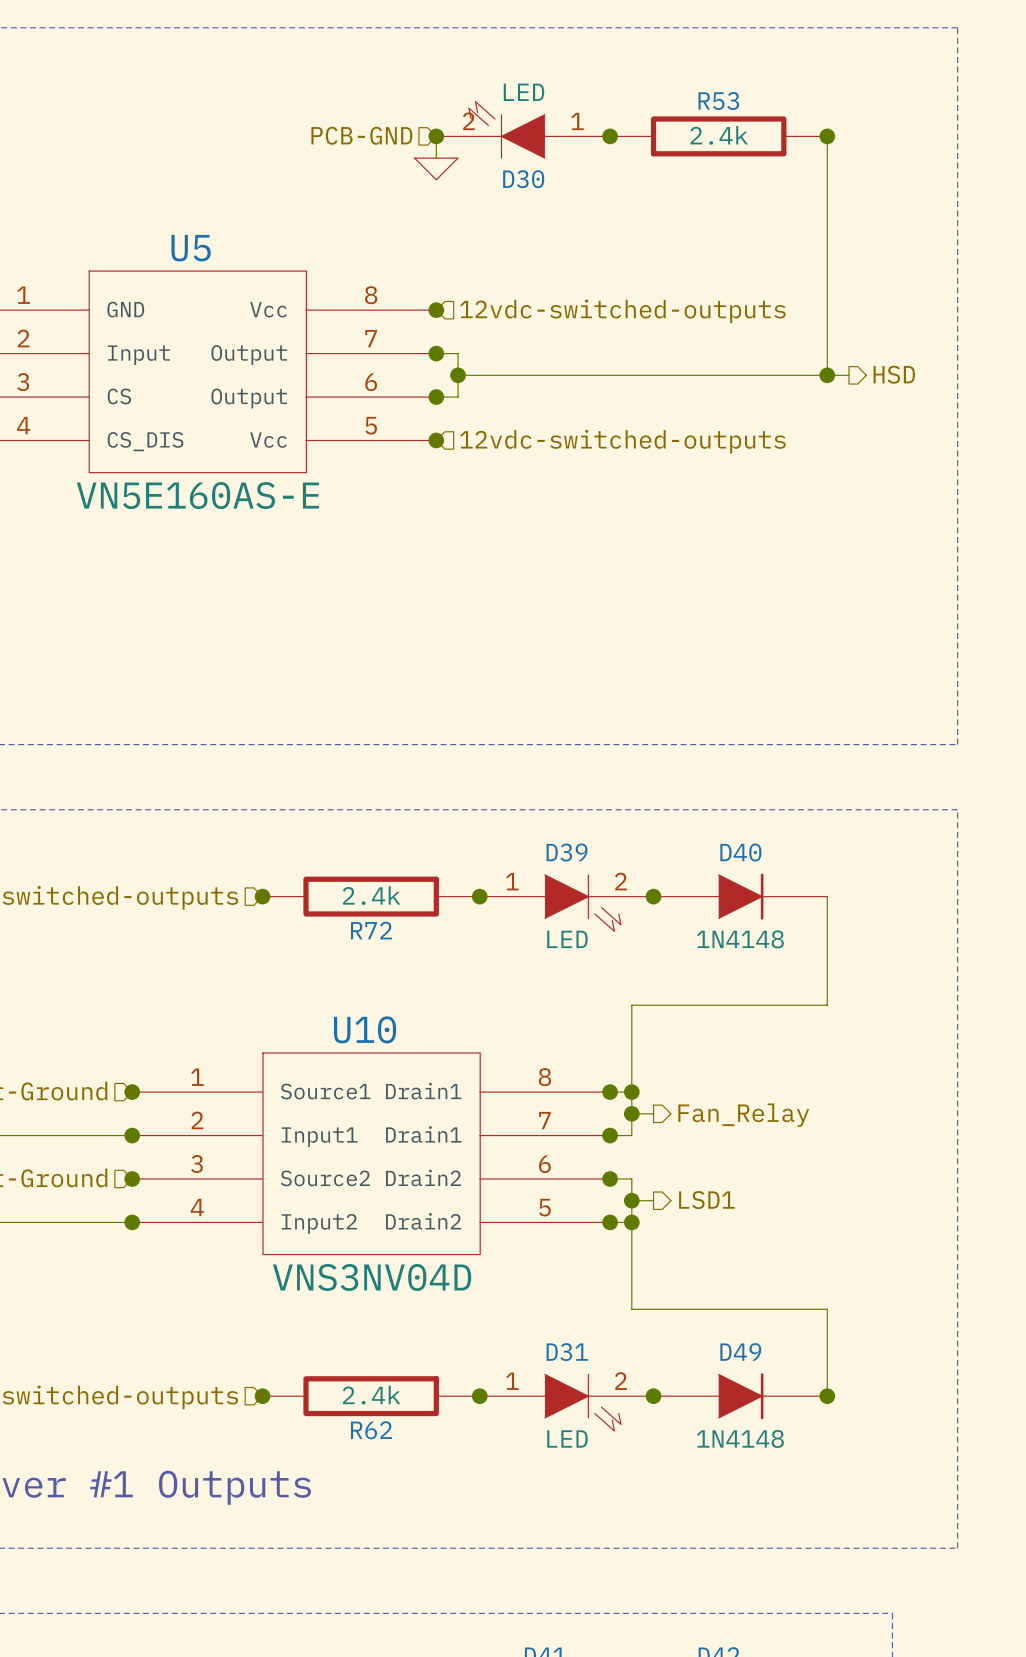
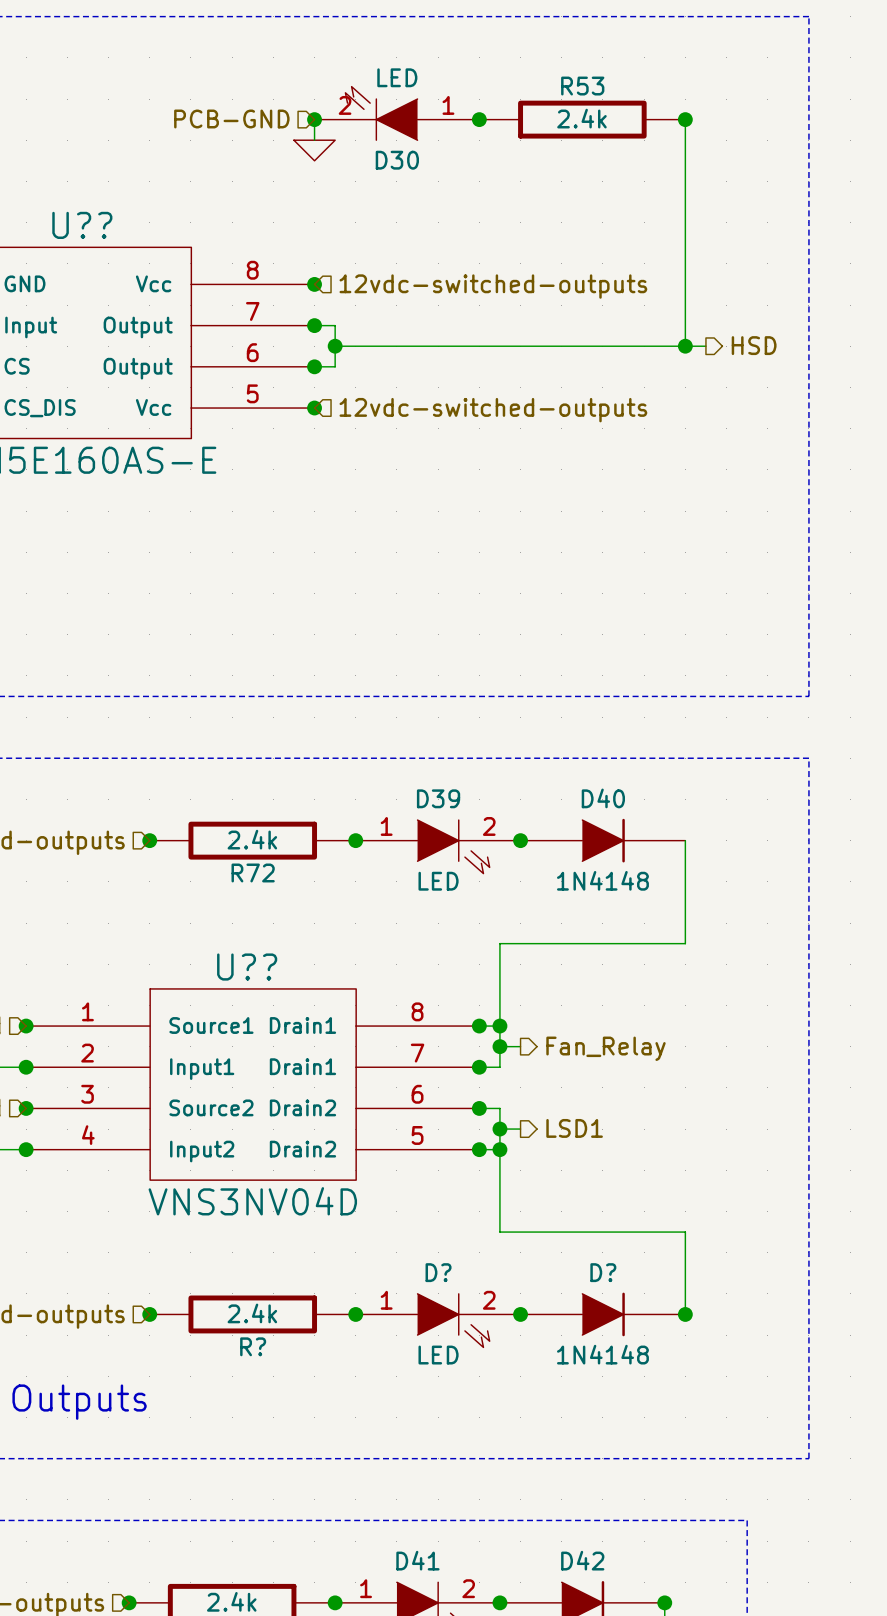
U5 name: U5 (191, 248) -> U?? (82, 225)
U10 name: U10 (365, 1029) -> U?? (247, 967)
D49 name: D49 (740, 1351) -> D? (603, 1272)
D31 name: D31 (567, 1352) -> D? (438, 1272)
R62 name: R62 (371, 1430) -> R? (253, 1346)

